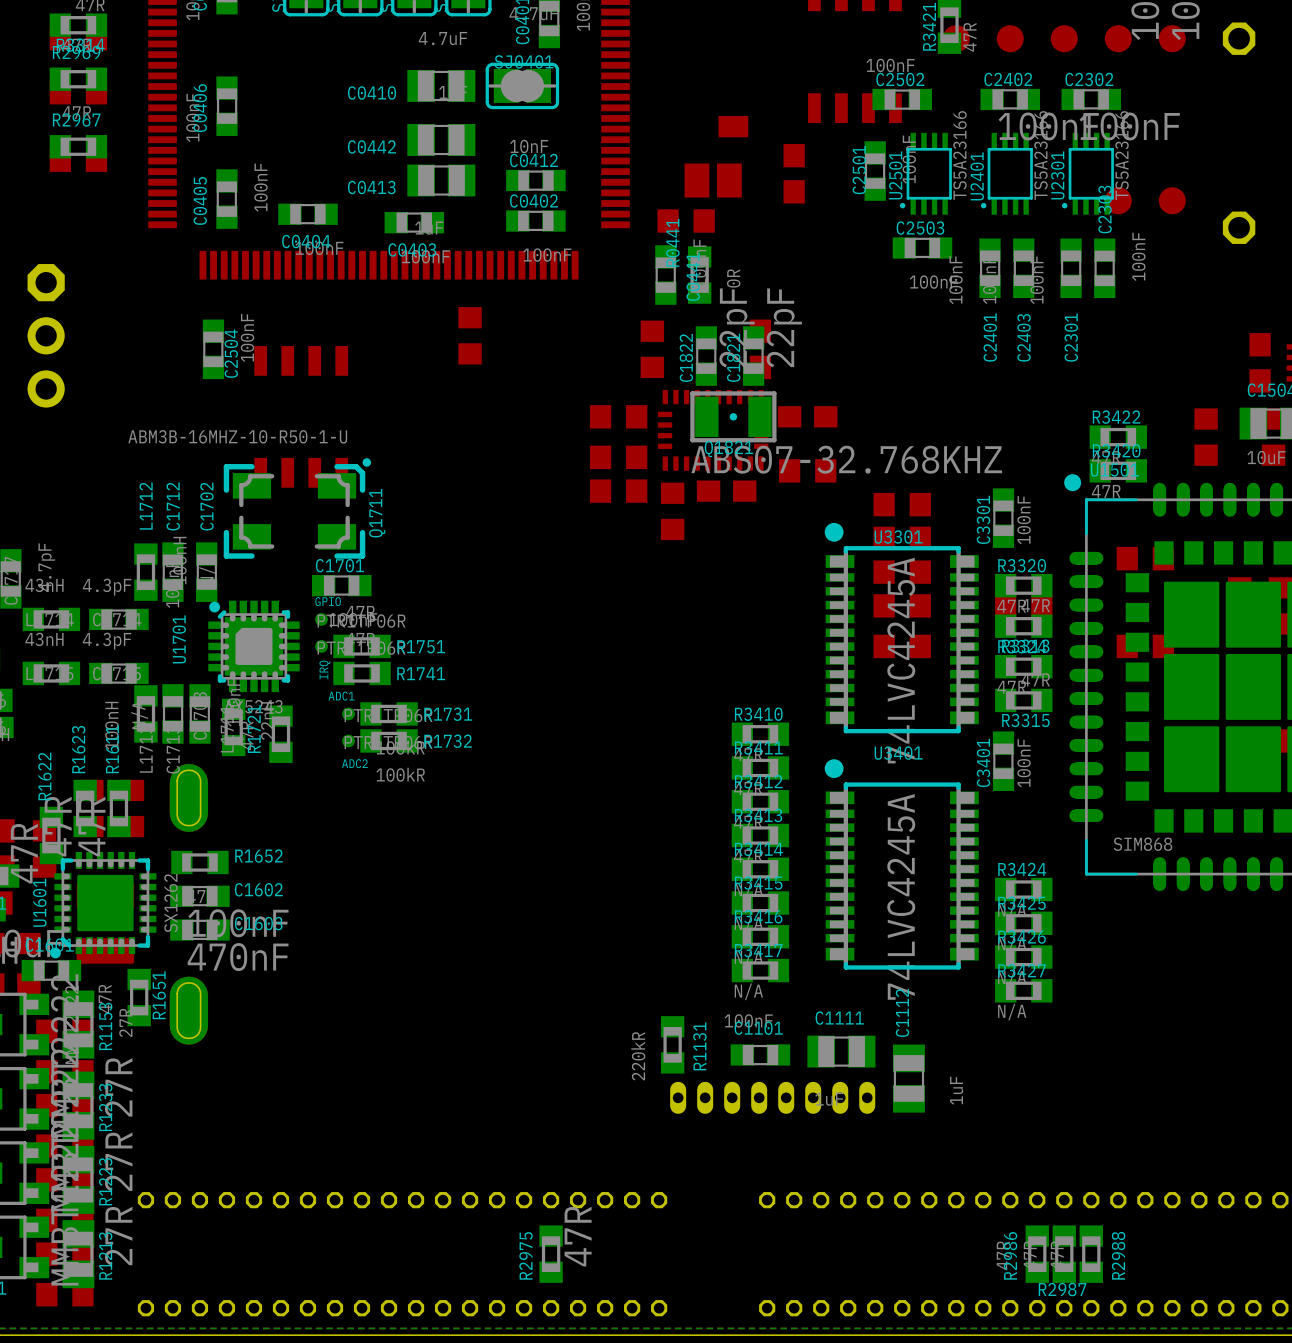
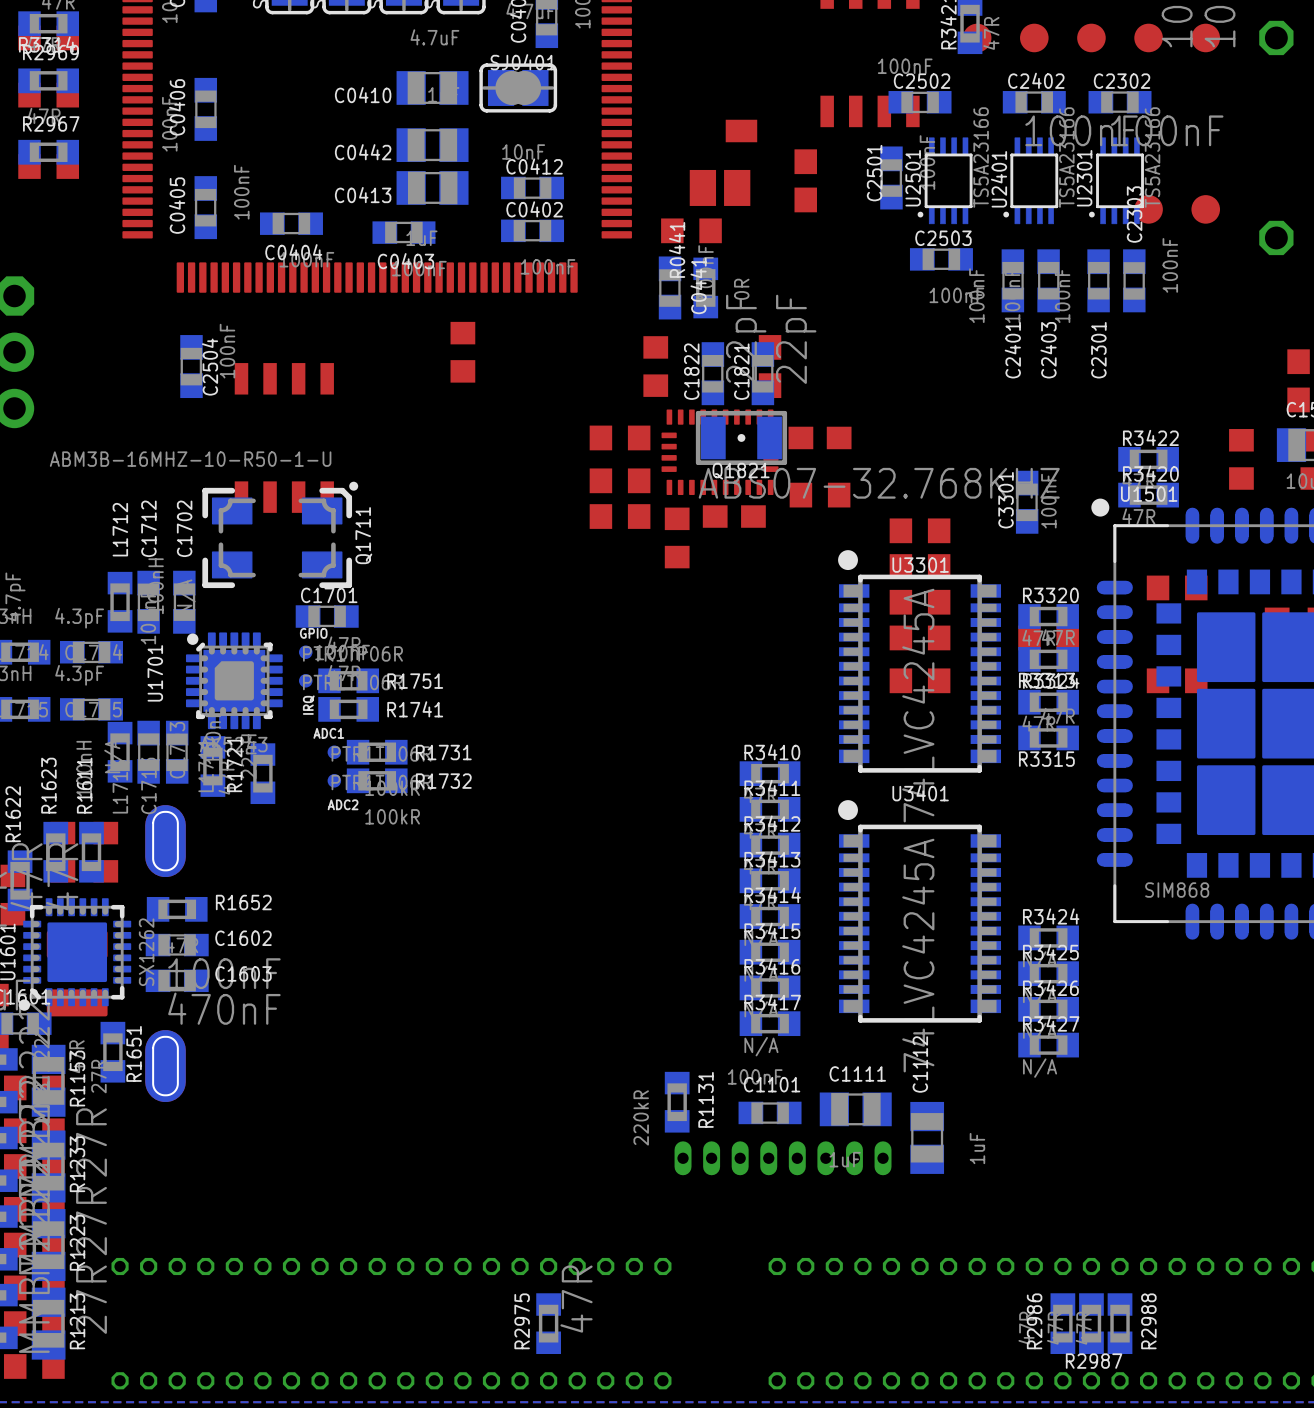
C3301 position: (1003, 518) -> (1027, 502)
C3401: 100nF (1003, 761) -> none

